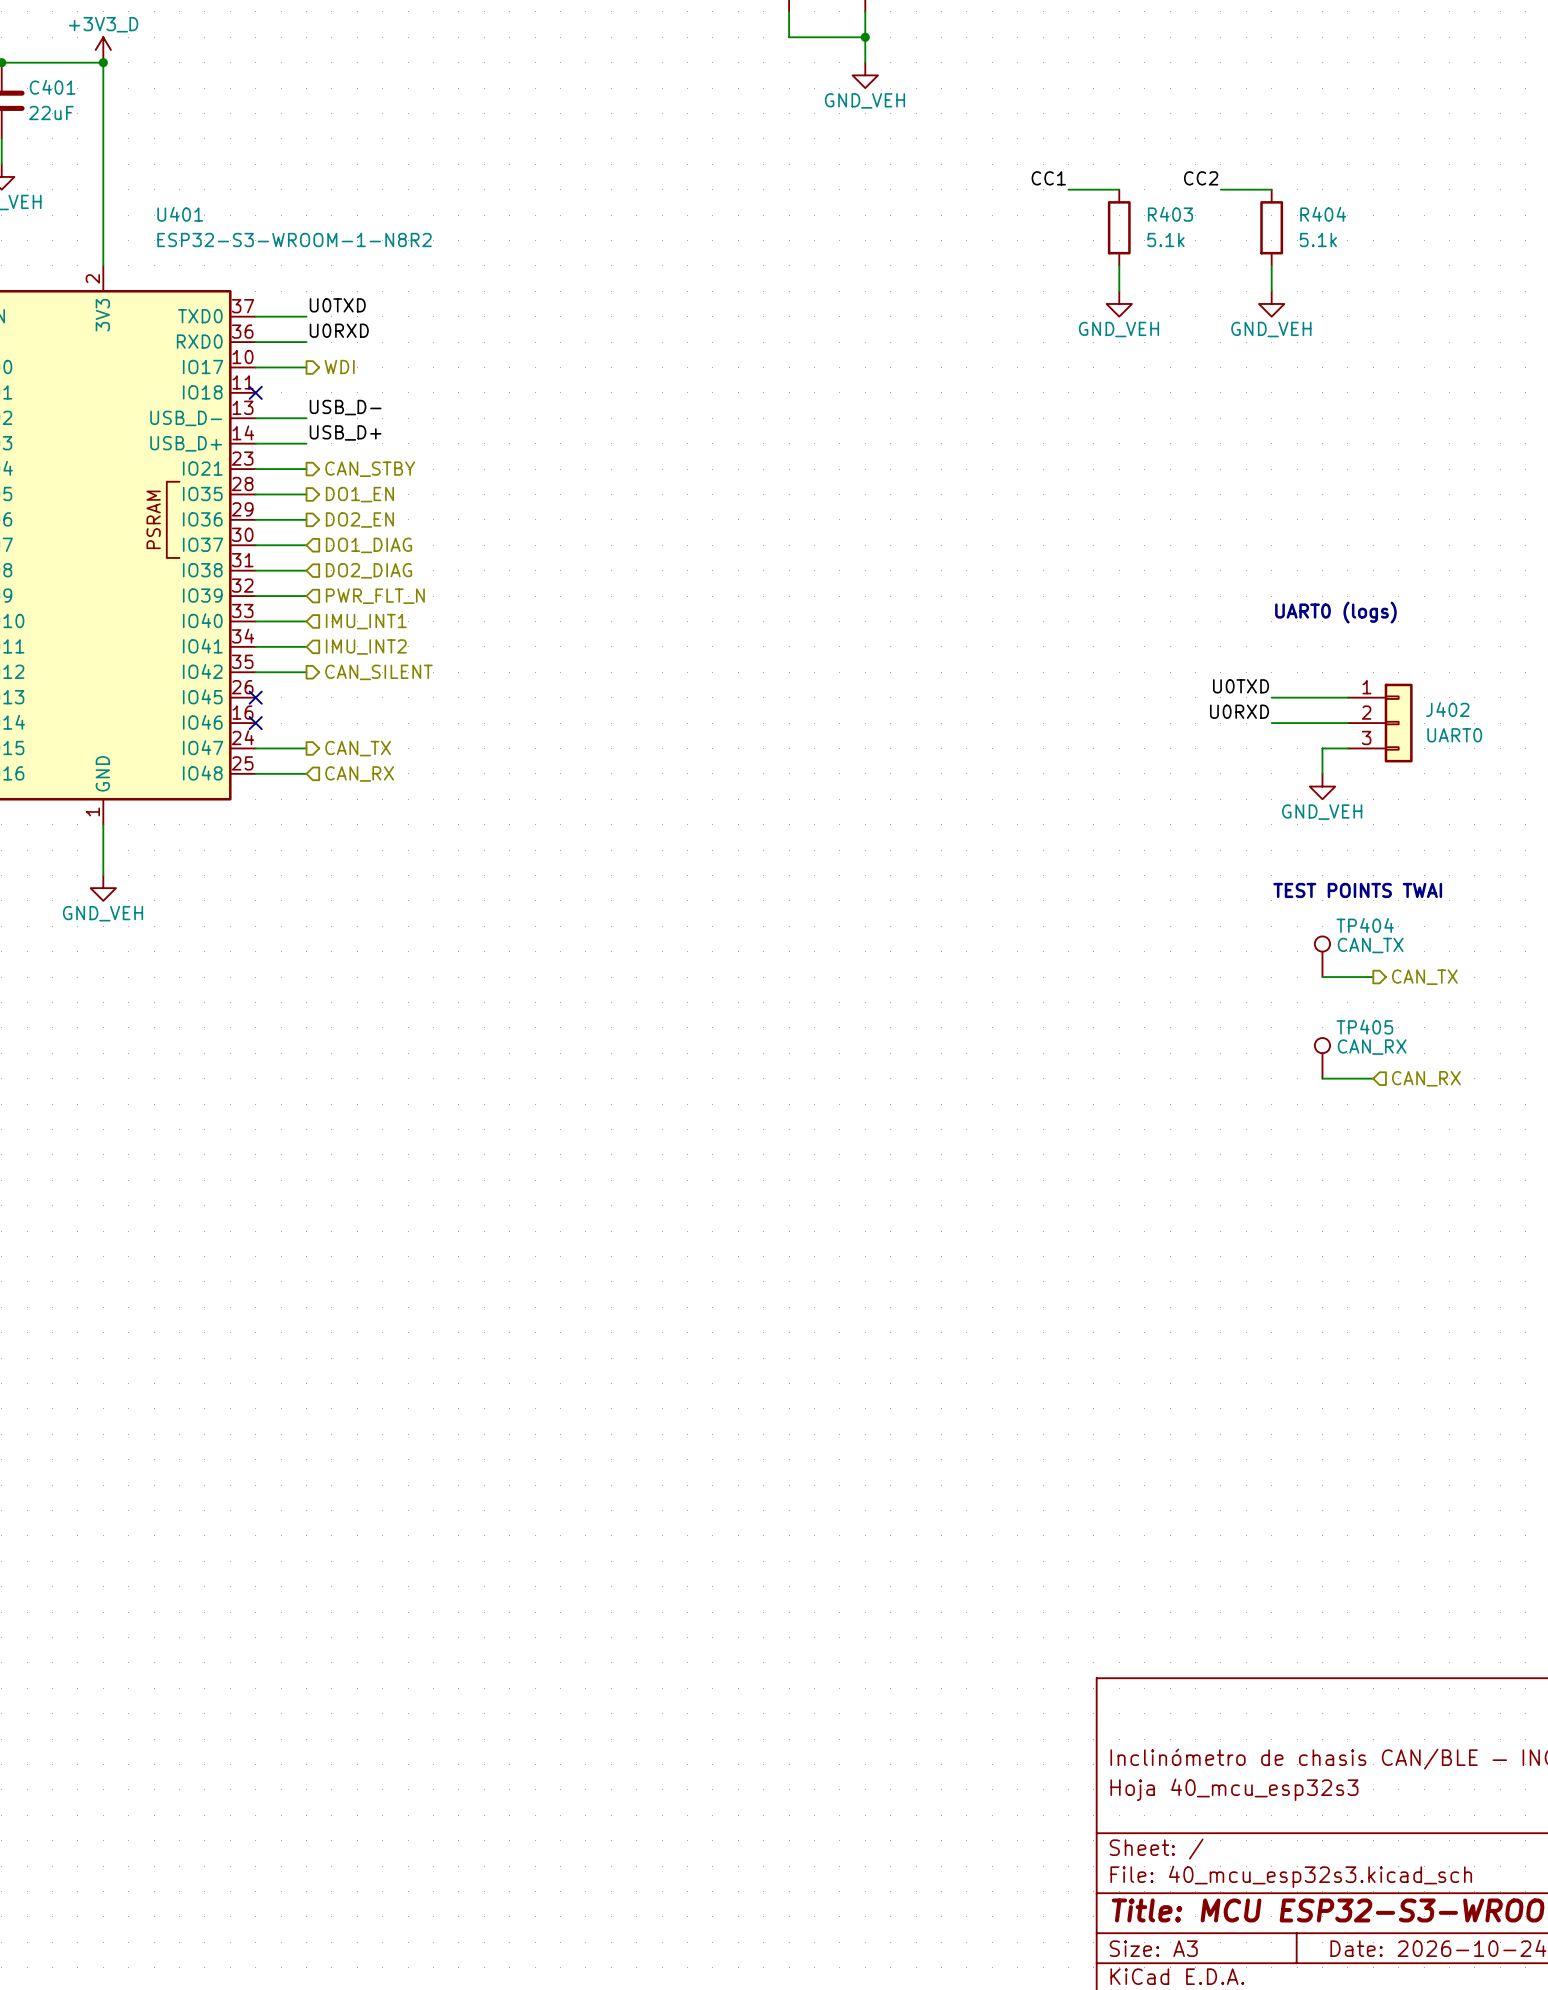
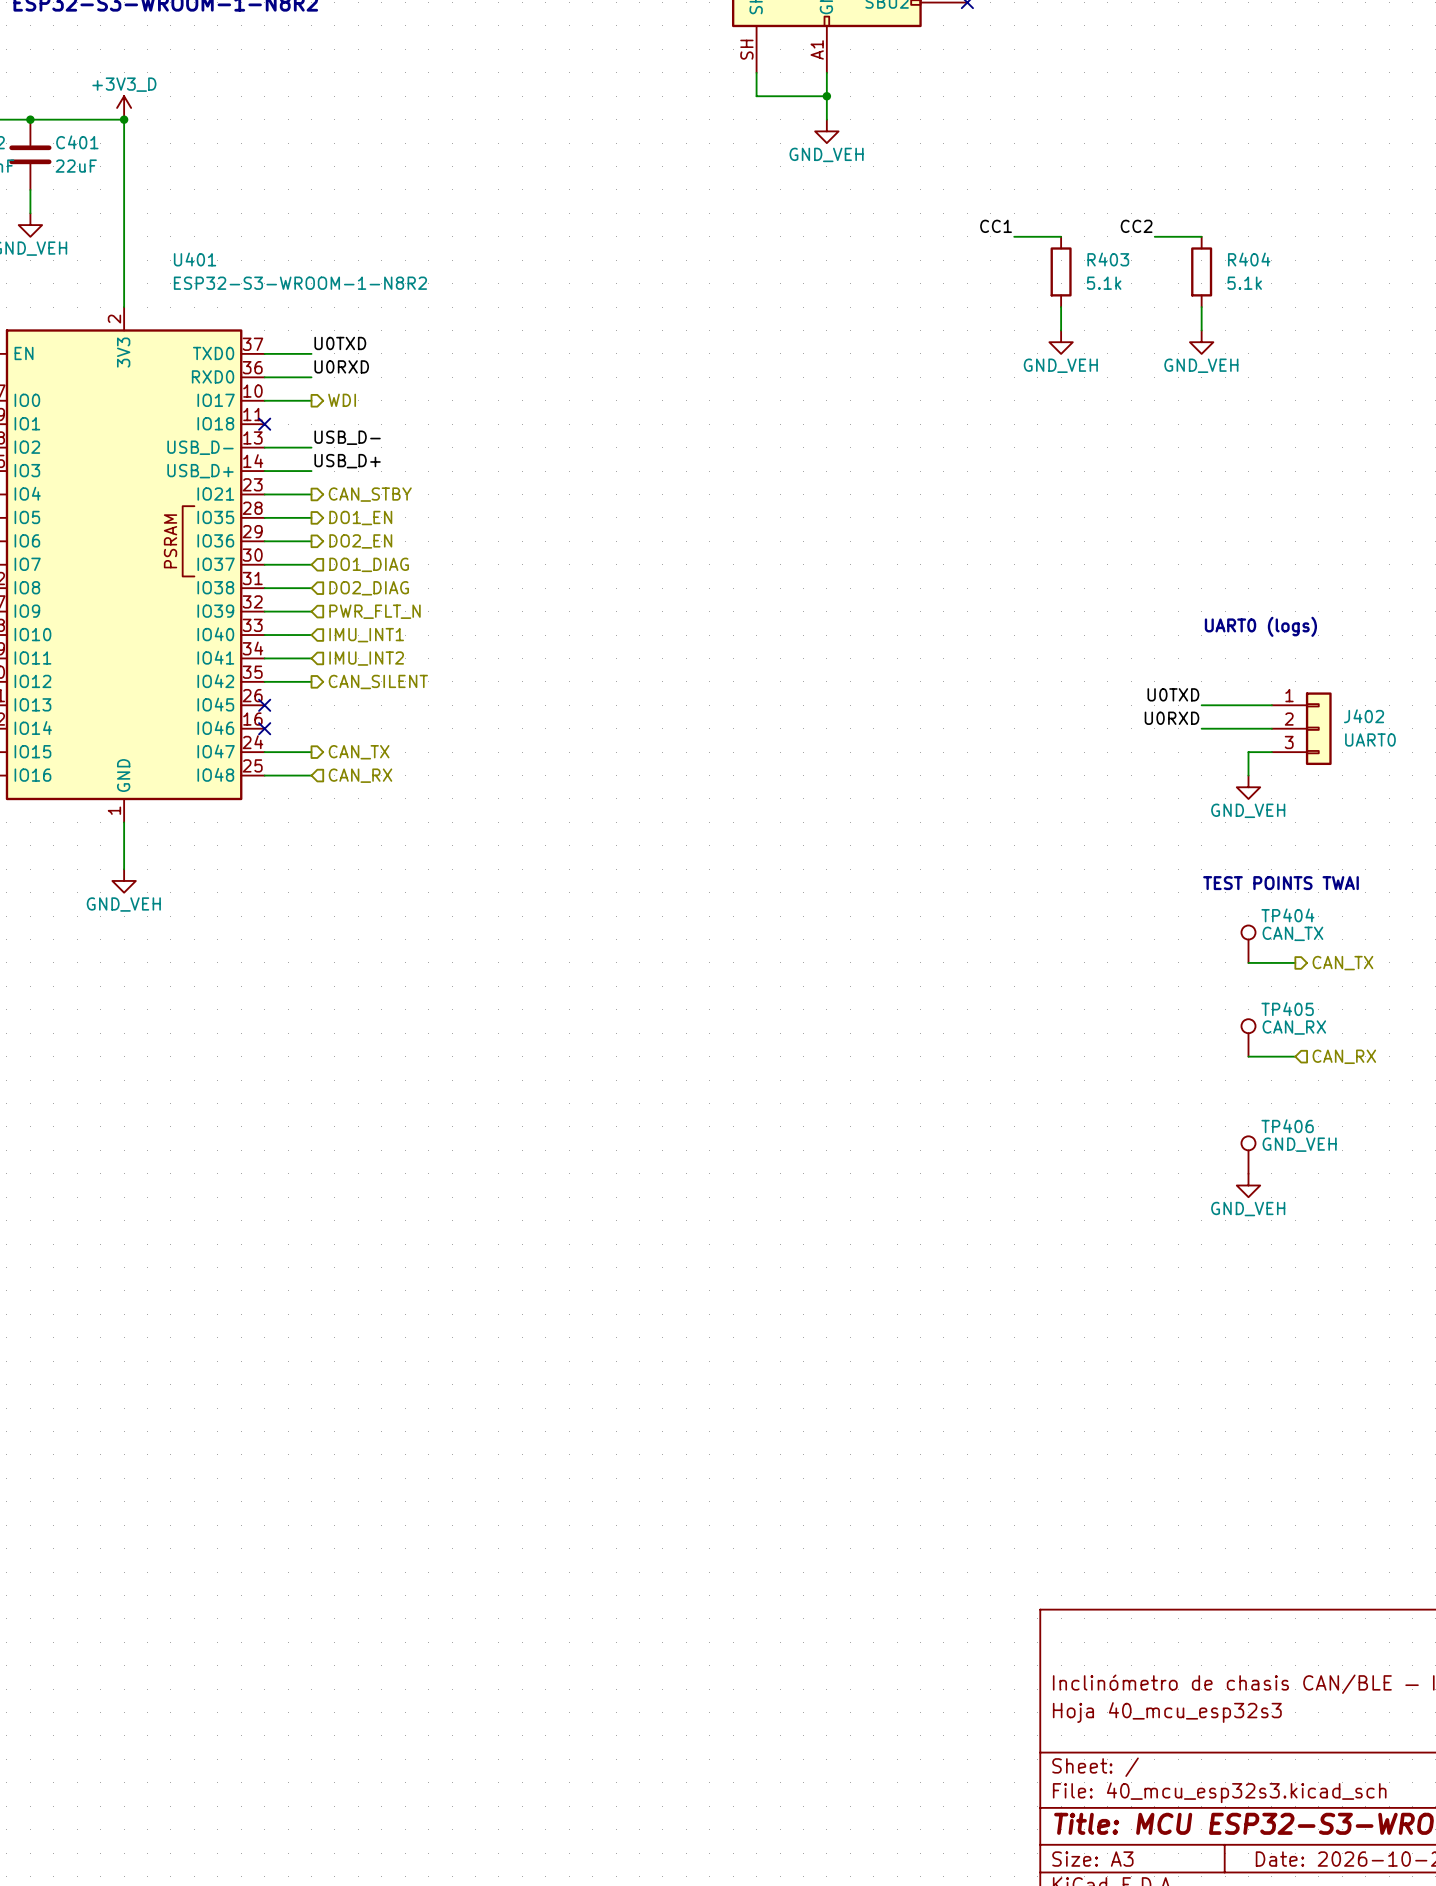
TP406: none -> GND_VEH (1248, 1155)
power symbol: none -> GND_VEH (1248, 1185)

